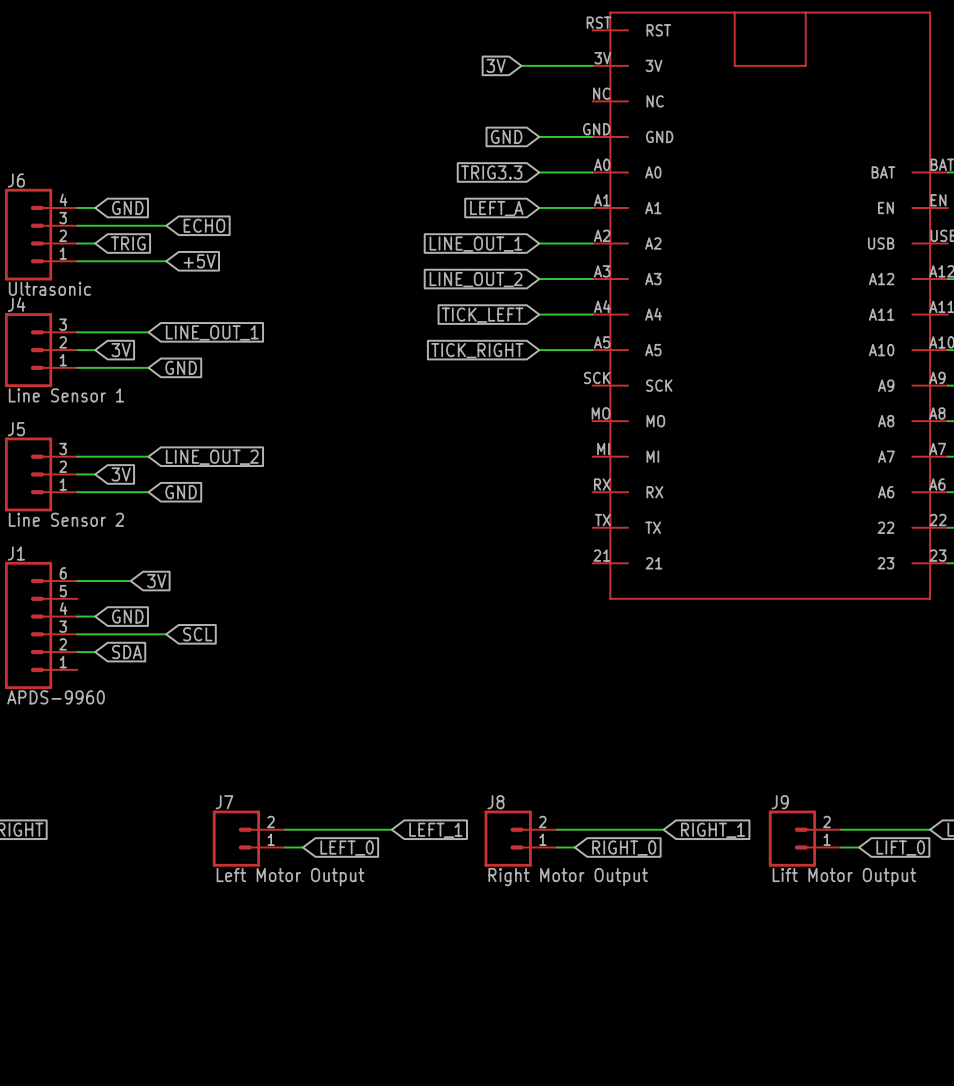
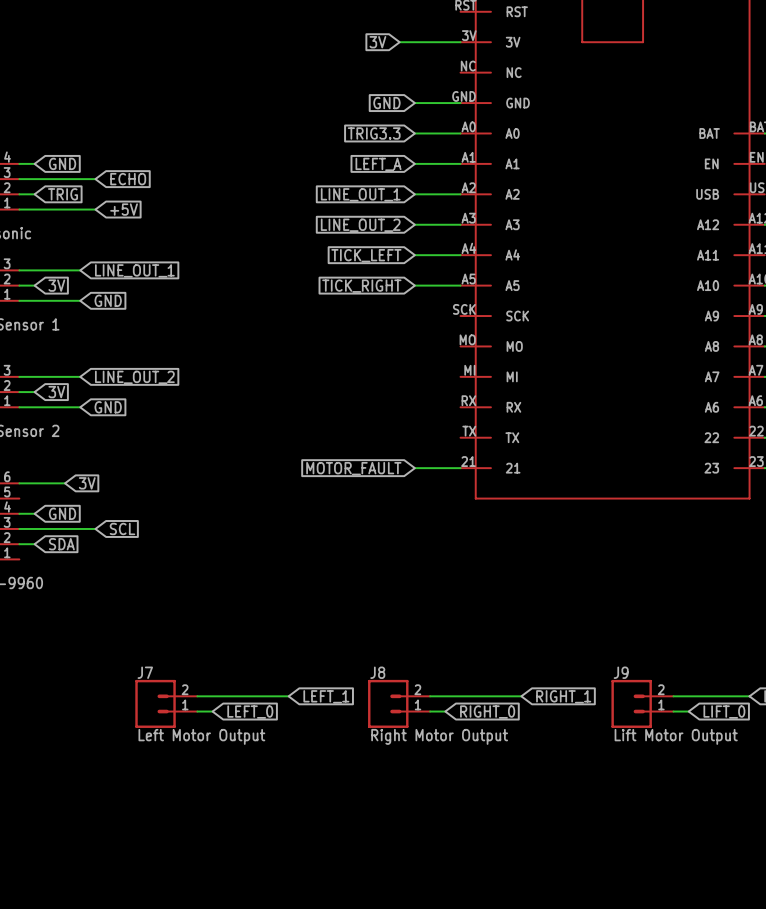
global label: none -> MOTOR_FAULT (353, 468)
wire: none -> (414, 468) (460, 468)

